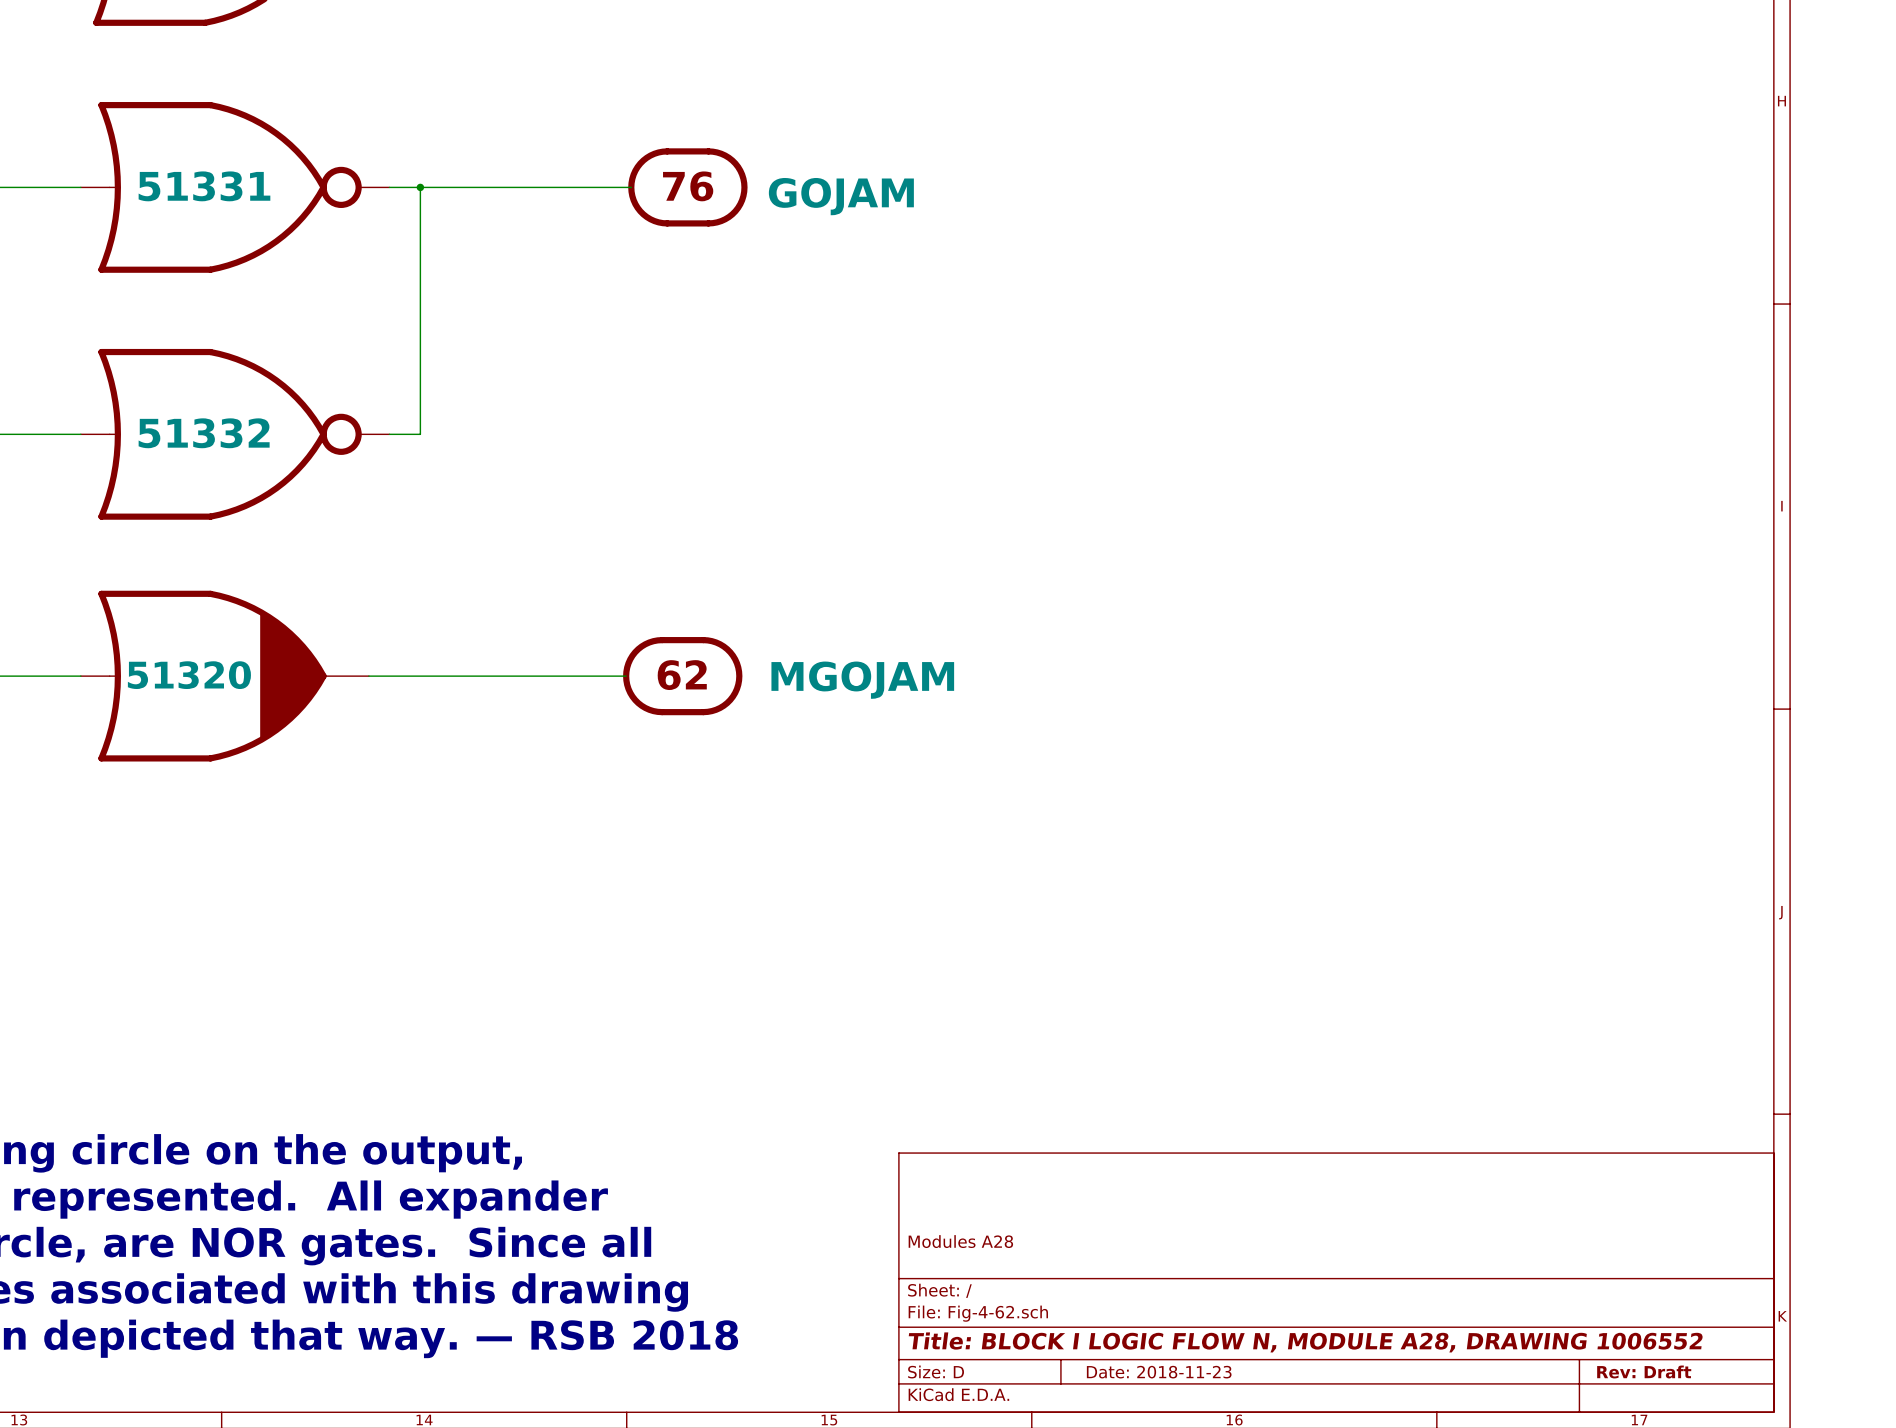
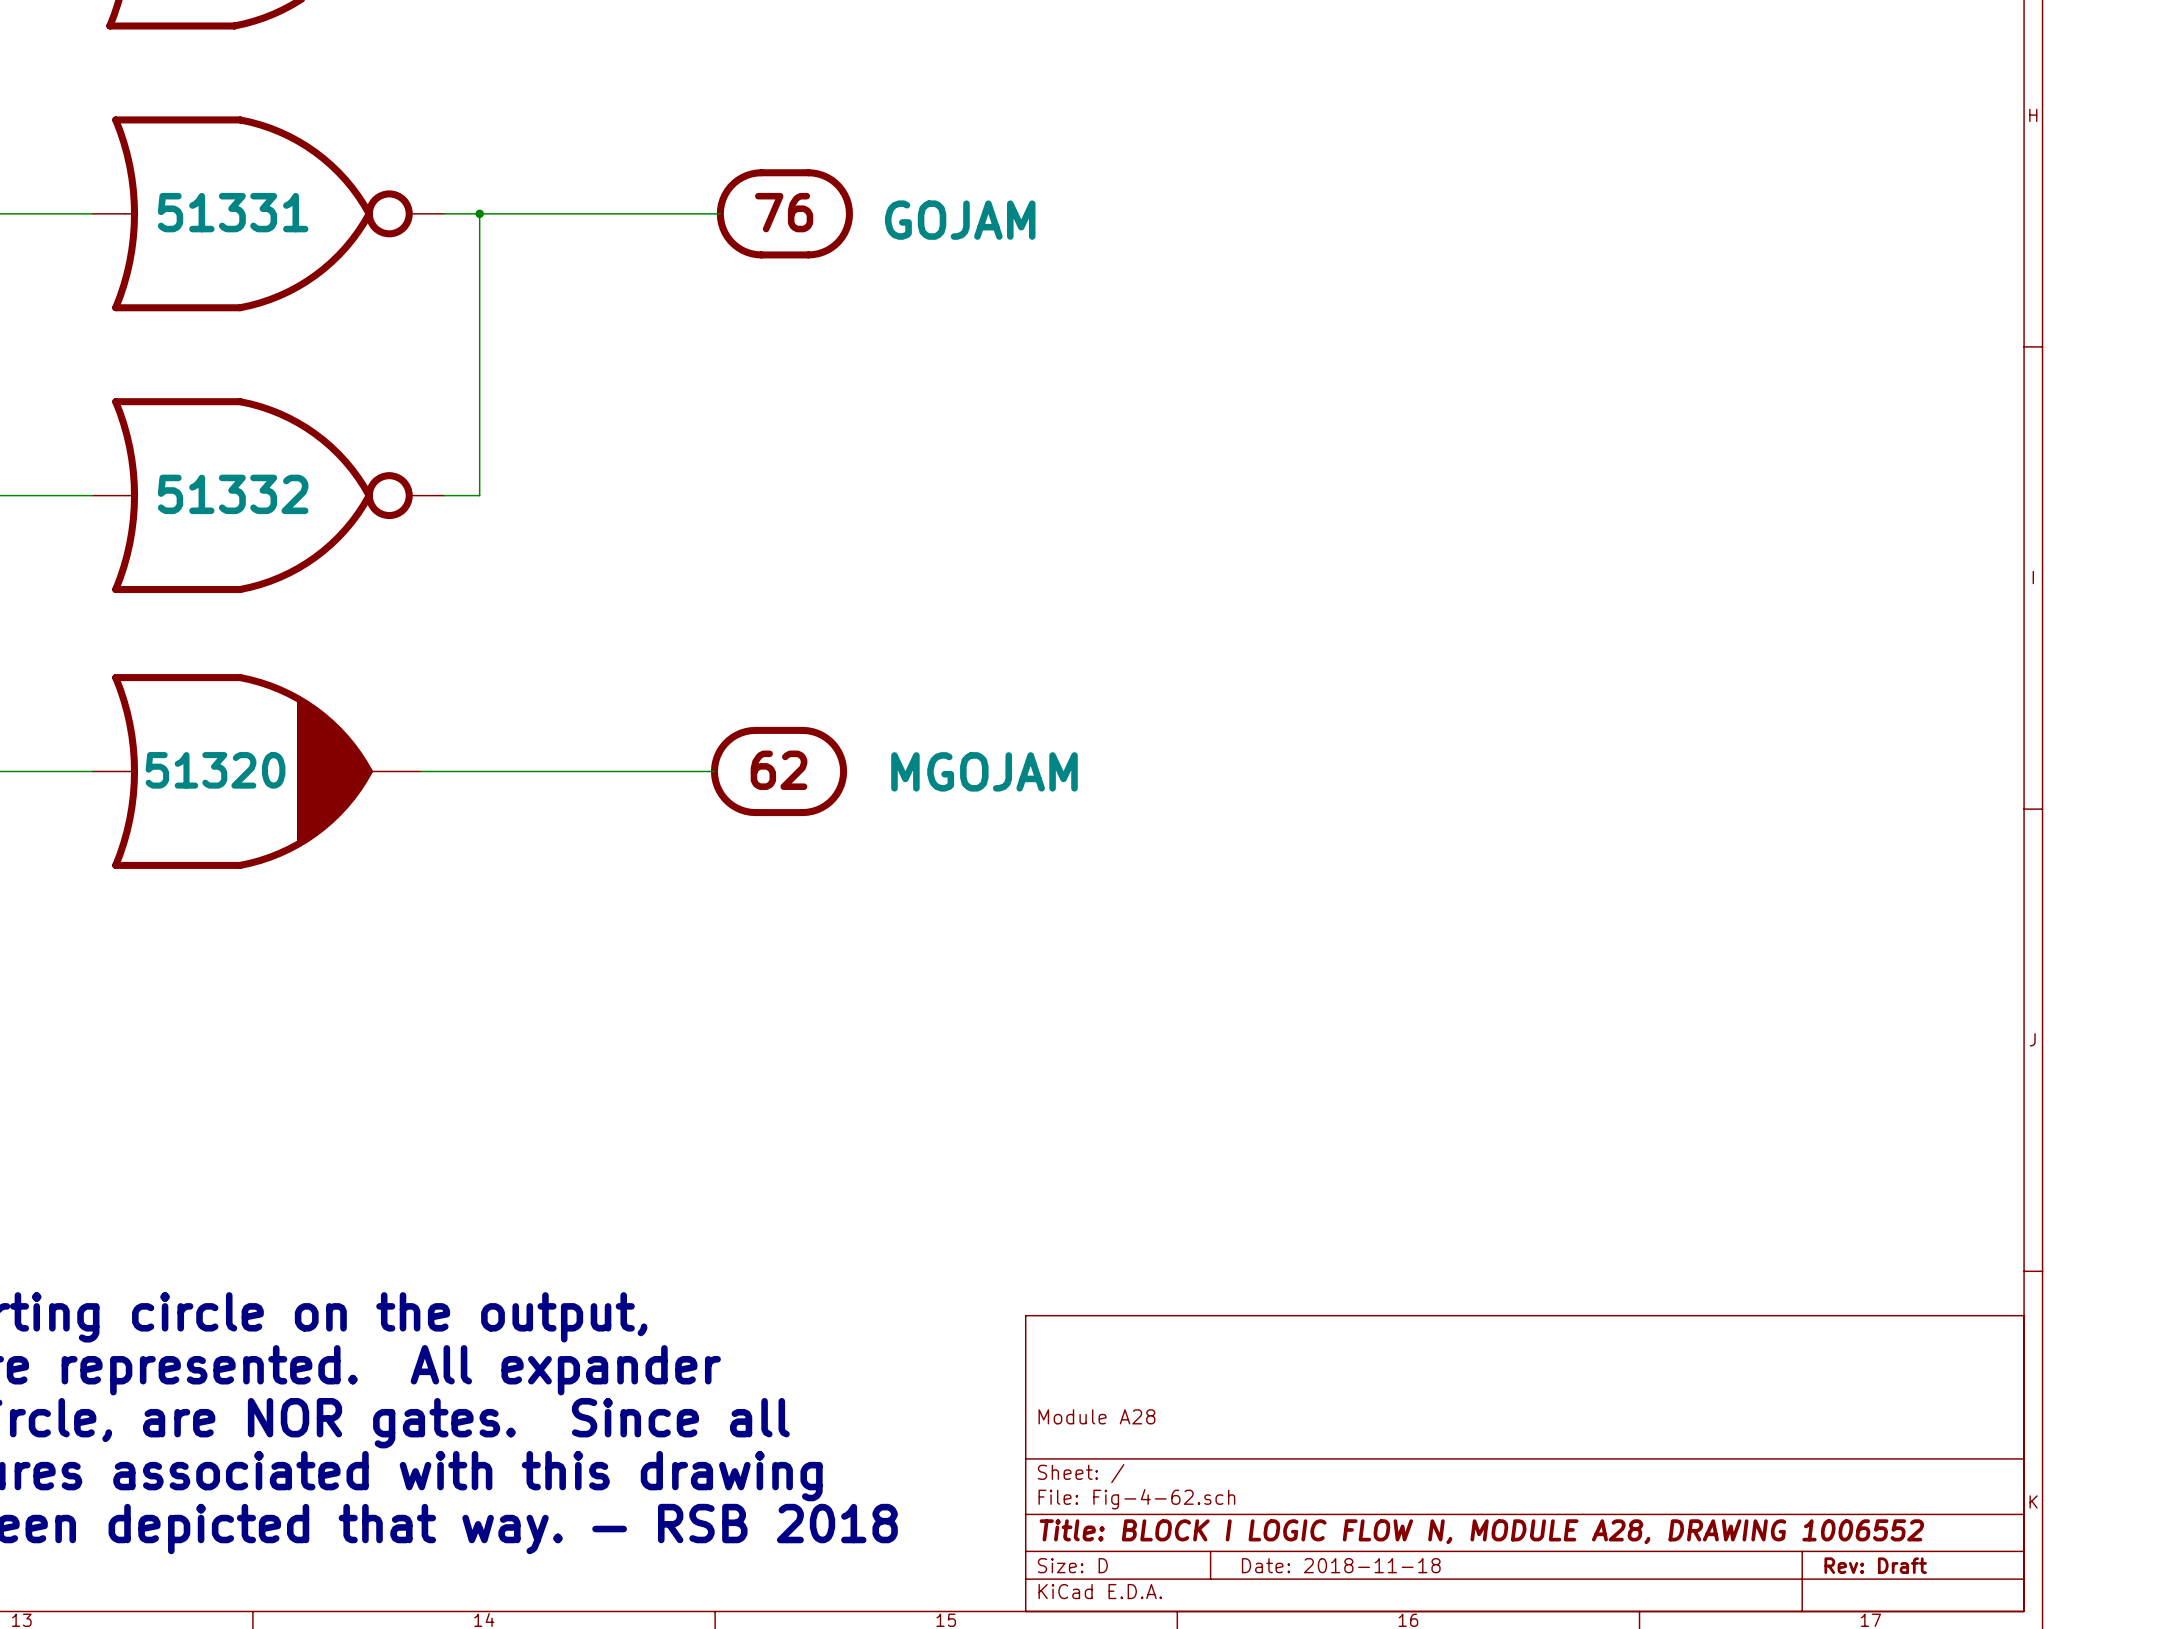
title block: Modules A28 (960, 1241) -> Module A28 (1096, 1416)
title block: Date: 2018-11-23 (1159, 1372) -> Date: 2018-11-18 (1341, 1565)

